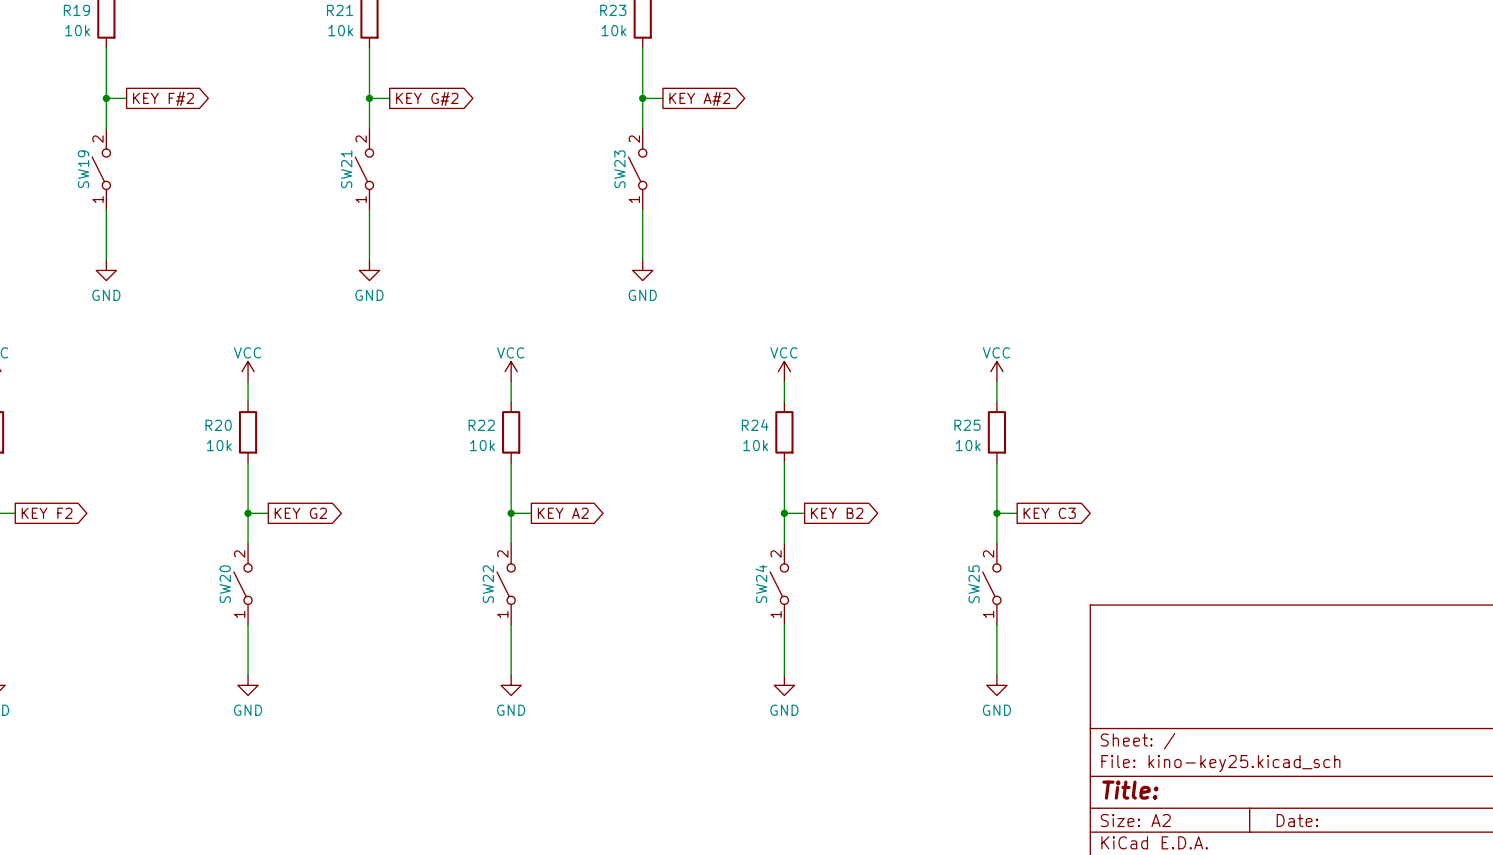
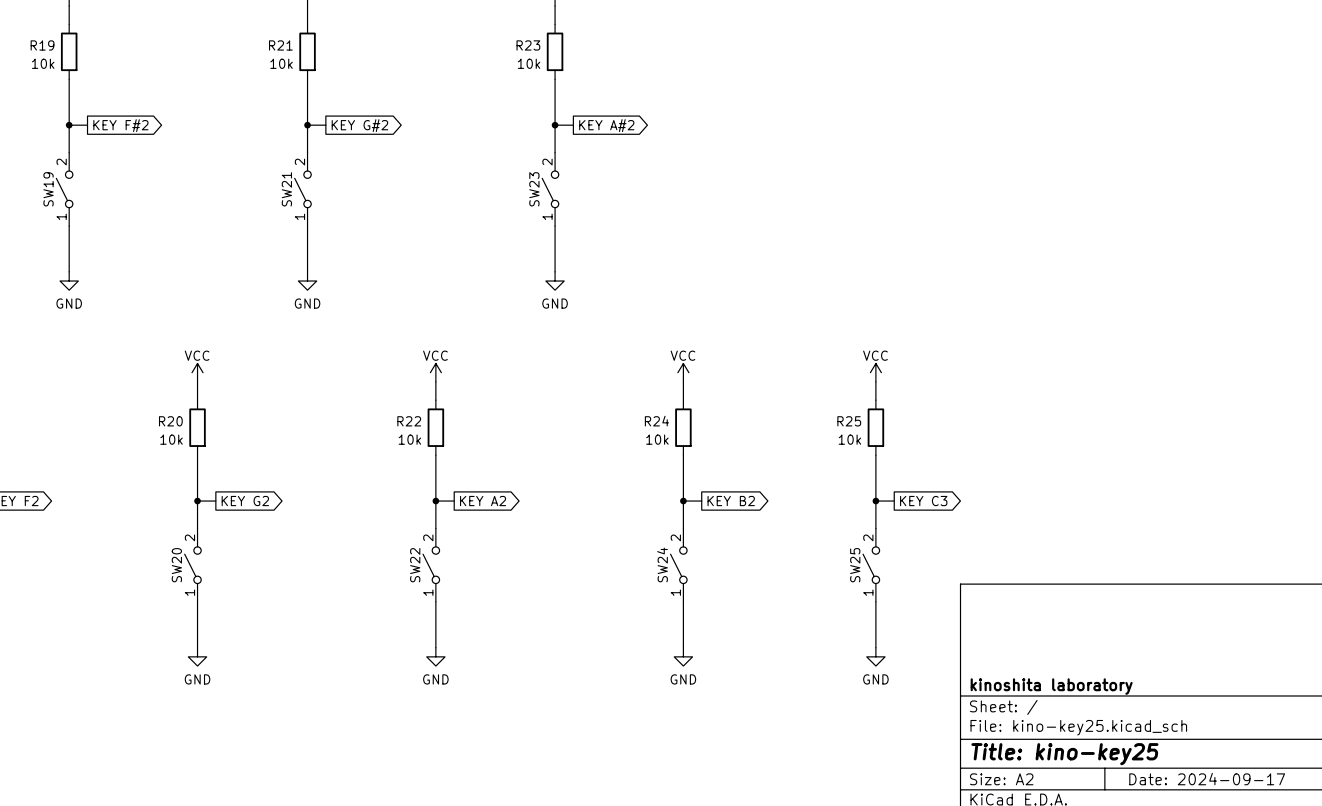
title block: none -> kinoshita laboratory (1051, 686)
title block: Title: (1130, 790) -> Title: kino-key25 (1064, 754)
title block: Date: (1297, 820) -> Date: 2024-09-17 (1207, 779)

